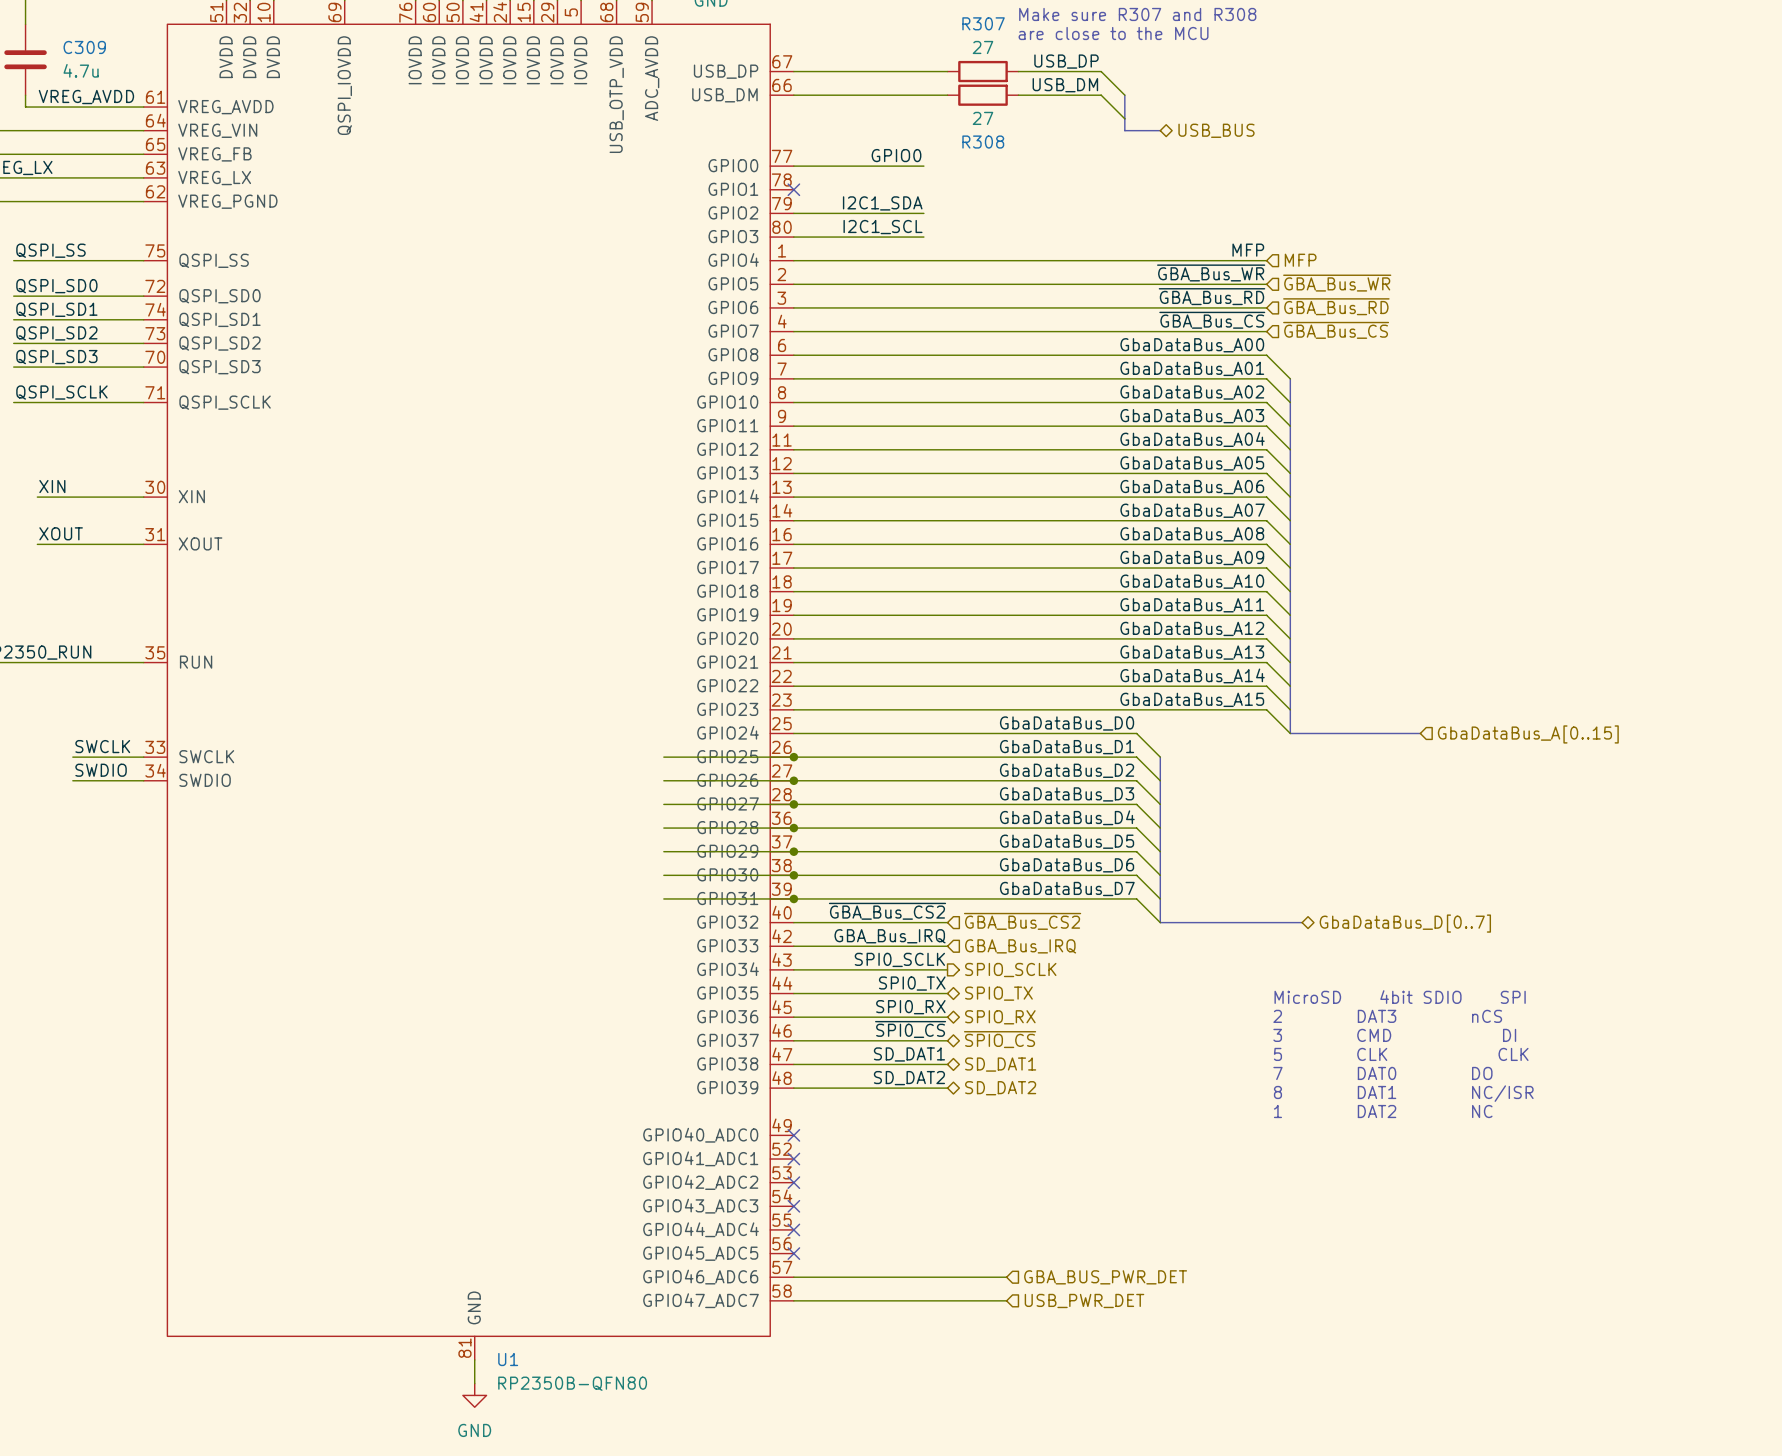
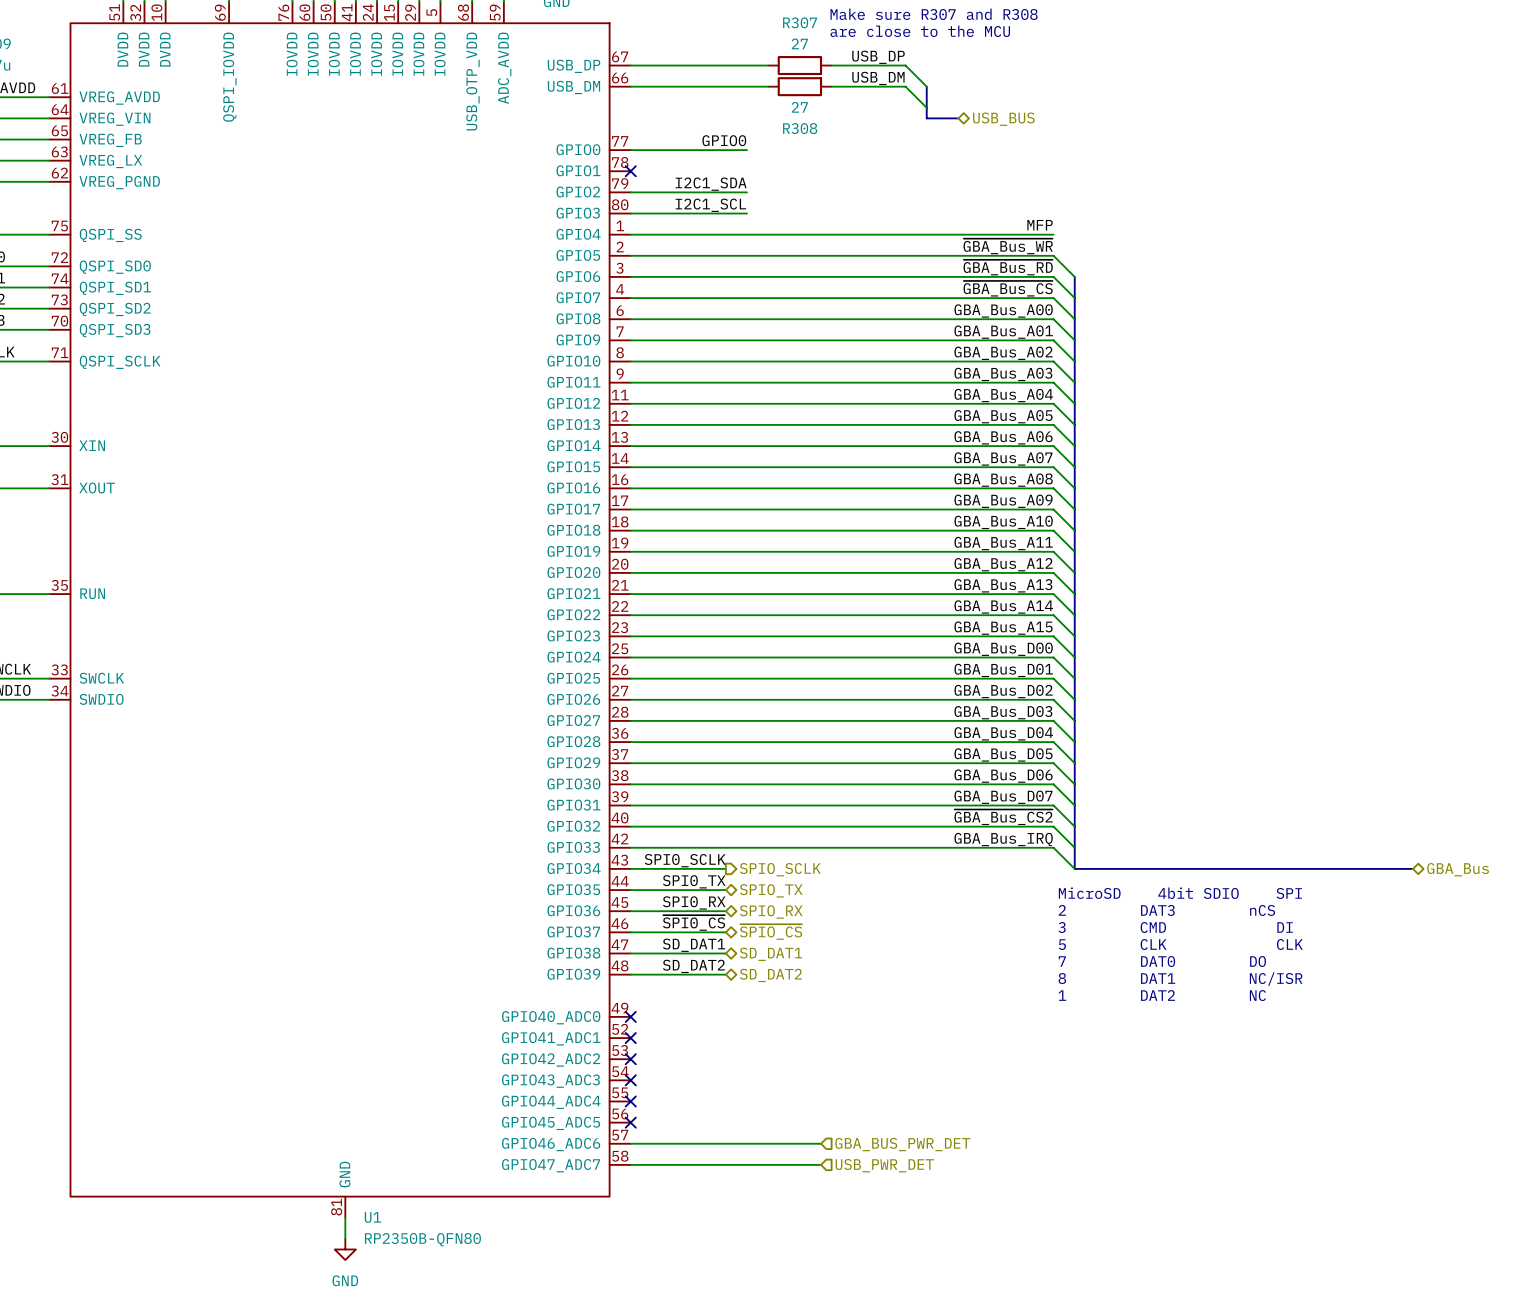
hierarchical label: MFP (1300, 260) -> none
hierarchical label: ~{GBA_Bus_WR} (1337, 283) -> none
wire: none -> (1053, 255) (1074, 276)
hierarchical label: ~{GBA_Bus_RD} (1336, 306) -> none
wire: none -> (1053, 276) (1074, 298)
bus: none -> (1074, 276) (1074, 340)
hierarchical label: ~{GBA_Bus_CS} (1336, 330) -> none
wire: none -> (1053, 298) (1074, 319)
label: GbaDataBus_A00 (1192, 345) -> GBA_Bus_A00 (1003, 310)
label: GbaDataBus_A01 (1192, 368) -> GBA_Bus_A01 (1003, 332)
label: GbaDataBus_A02 (1192, 392) -> GBA_Bus_A02 (1003, 353)
label: GbaDataBus_A03 (1192, 416) -> GBA_Bus_A03 (1003, 374)
label: GbaDataBus_A04 (1192, 439) -> GBA_Bus_A04 (1003, 395)
label: GbaDataBus_A05 (1192, 463) -> GBA_Bus_A05 (1003, 416)
label: GbaDataBus_A06 (1192, 487) -> GBA_Bus_A06 (1003, 437)
label: GbaDataBus_A07 (1192, 510) -> GBA_Bus_A07 (1003, 458)
label: GbaDataBus_A08 (1192, 534) -> GBA_Bus_A08 (1003, 480)
label: GbaDataBus_A09 (1192, 558) -> GBA_Bus_A09 (1003, 501)
label: GbaDataBus_A10 (1192, 581) -> GBA_Bus_A10 (1003, 522)
label: GbaDataBus_A11 (1192, 605) -> GBA_Bus_A11 (1003, 543)
label: GbaDataBus_A12 (1192, 628) -> GBA_Bus_A12 (1003, 564)
label: GbaDataBus_A13 (1192, 652) -> GBA_Bus_A13 (1003, 585)
label: GbaDataBus_A14 (1192, 675) -> GBA_Bus_A14 (1003, 606)
label: GbaDataBus_A15 (1192, 699) -> GBA_Bus_A15 (1003, 628)
label: GbaDataBus_D0 (1067, 723) -> none
label: none -> GBA_Bus_D00 (1003, 649)
wire: (1136, 733) (1160, 757) -> (937, 657) (1053, 657) (1074, 678)
bus: (1290, 733) (1420, 733) -> (1074, 657) (1074, 868) (1413, 868)
hierarchical label: GbaDataBus_A[0..15] (1528, 734) -> none
label: GbaDataBus_D1 (1067, 747) -> none
label: none -> GBA_Bus_D01 (1003, 670)
wire: (663, 757) (793, 757) -> none
junction: (793, 757) -> none
wire: (1136, 757) (1160, 780) -> (937, 678) (1053, 678) (1074, 699)
bus: (1160, 757) (1160, 922) (1302, 922) -> none
label: GbaDataBus_D2 (1067, 770) -> none
label: none -> GBA_Bus_D02 (1003, 691)
wire: (663, 780) (793, 780) -> none
junction: (793, 780) -> none
wire: (1136, 780) (1160, 804) -> (937, 699) (1053, 699) (1074, 720)
label: GbaDataBus_D3 (1067, 794) -> none
label: none -> GBA_Bus_D03 (1003, 712)
wire: (663, 804) (793, 804) -> none
junction: (793, 804) -> none
wire: (1136, 804) (1160, 828) -> (937, 720) (1053, 720) (1074, 742)
label: GbaDataBus_D4 (1067, 817) -> none
label: none -> GBA_Bus_D04 (1003, 733)
wire: (663, 828) (793, 828) -> none
junction: (793, 828) -> none
wire: (1136, 828) (1160, 851) -> (937, 742) (1053, 742) (1074, 763)
label: GbaDataBus_D5 (1067, 841) -> none
label: none -> GBA_Bus_D05 (1003, 754)
wire: (663, 851) (793, 851) -> none
junction: (793, 851) -> none
wire: (1136, 851) (1160, 875) -> (937, 763) (1053, 763) (1074, 784)
label: GbaDataBus_D6 (1067, 865) -> none
label: none -> GBA_Bus_D06 (1003, 776)
wire: (663, 875) (793, 875) -> none
junction: (793, 875) -> none
wire: (1136, 875) (1160, 898) -> (937, 784) (1053, 784) (1074, 805)
label: GbaDataBus_D7 (1067, 888) -> none
label: none -> GBA_Bus_D07 (1003, 797)
wire: (663, 898) (793, 898) -> none
junction: (793, 898) -> none
wire: (1136, 898) (1160, 922) -> (937, 805) (1053, 805) (1074, 826)
label: ~{GBA_Bus_CS2} (887, 911) -> none
label: none -> ~{GBA_Bus_CS2} (1003, 817)
hierarchical label: ~{GBA_Bus_CS2} (1022, 921) -> none
wire: none -> (768, 826) (1053, 826) (1074, 847)
hierarchical label: GbaDataBus_D[0..7] (1405, 923) -> none
label: GBA_Bus_IRQ (890, 936) -> none
label: none -> GBA_Bus_IRQ (1003, 839)
wire: none -> (768, 847) (1053, 847) (1074, 868)
hierarchical label: GBA_Bus_IRQ (1020, 946) -> none
label position: SPI0_SCLK (899, 959) -> SPI0_SCLK (685, 860)
wire: (900, 969) (947, 969) -> none
hierarchical label position: SPIO_SCLK (1010, 970) -> SPIO_SCLK (780, 869)
hierarchical label: none -> GBA_Bus (1458, 869)
label position: SPI0_TX (912, 983) -> SPI0_TX (694, 881)
wire: (900, 993) (947, 993) -> none
hierarchical label position: SPIO_TX (998, 993) -> SPIO_TX (771, 890)
label position: SPI0_RX (910, 1007) -> SPI0_RX (694, 902)
wire: (900, 1017) (947, 1017) -> none
hierarchical label position: SPIO_RX (1000, 1017) -> SPIO_RX (771, 912)
label position: ~{SPI0_CS} (910, 1029) -> ~{SPI0_CS} (693, 922)
hierarchical label position: ~{SPIO_CS} (1000, 1039) -> ~{SPIO_CS} (771, 932)
wire: (900, 1040) (947, 1040) -> none
label position: SD_DAT1 (909, 1054) -> SD_DAT1 (694, 945)
wire: (900, 1064) (947, 1064) -> none
hierarchical label position: SD_DAT1 (1000, 1064) -> SD_DAT1 (771, 954)
label position: SD_DAT2 (909, 1078) -> SD_DAT2 (693, 966)
wire: (900, 1088) (947, 1088) -> none
hierarchical label position: SD_DAT2 (1000, 1088) -> SD_DAT2 (770, 975)

